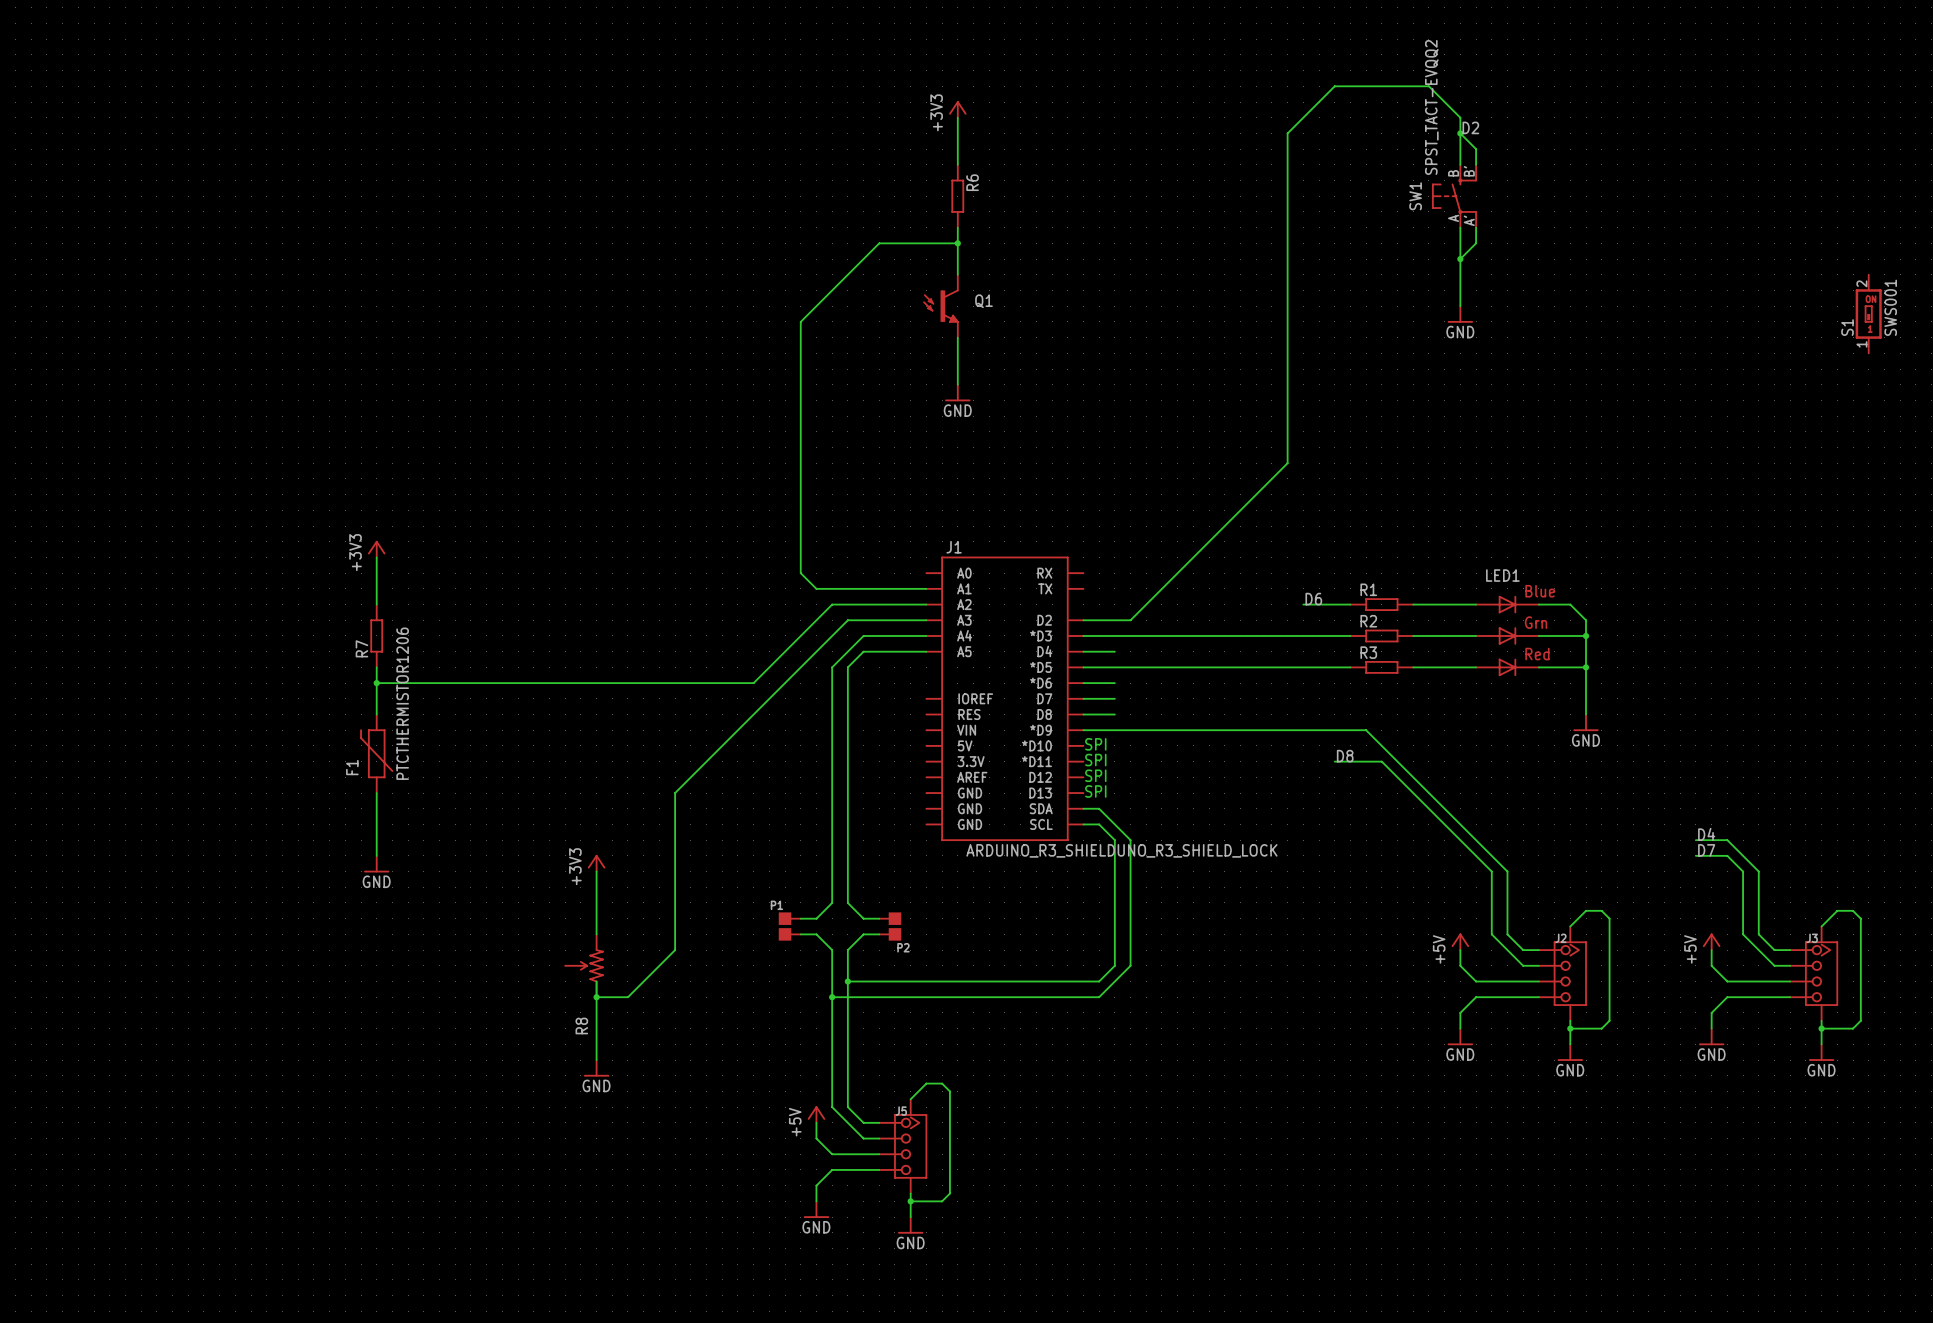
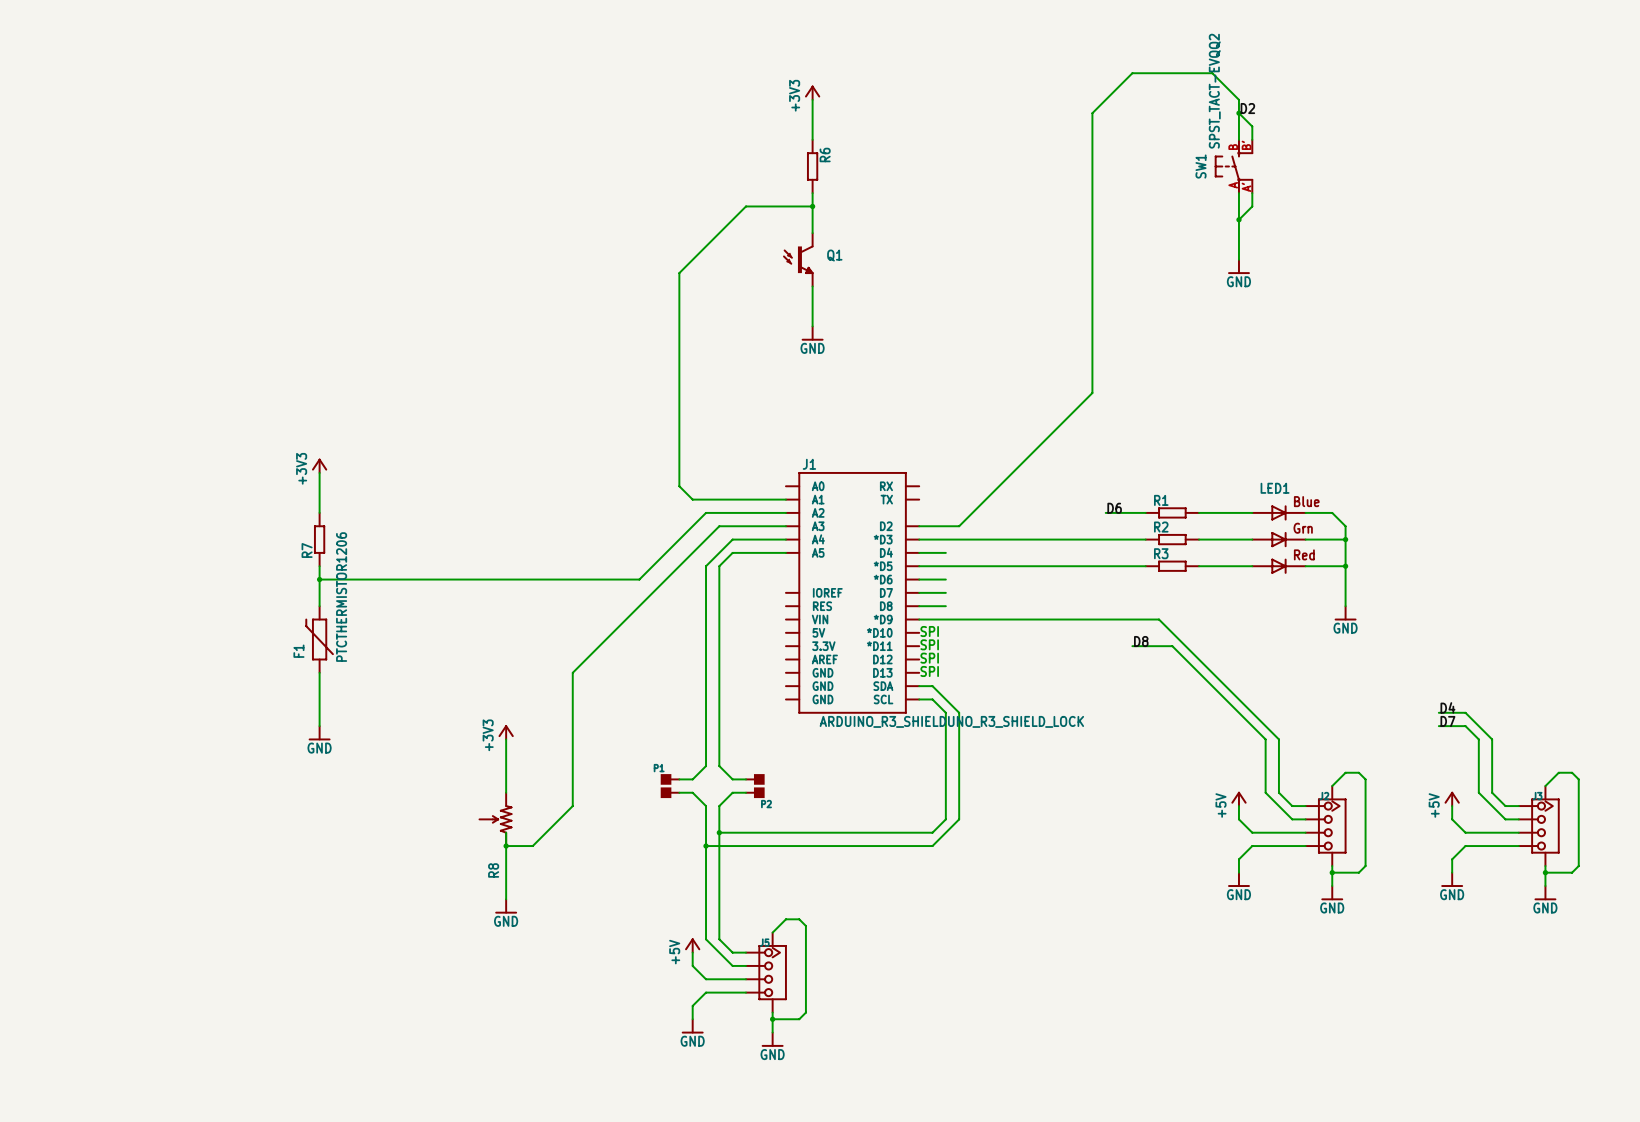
S1: SWS001 (1868, 314) -> none

